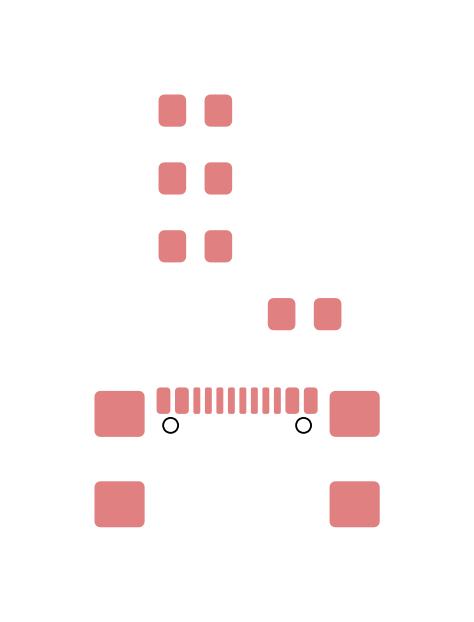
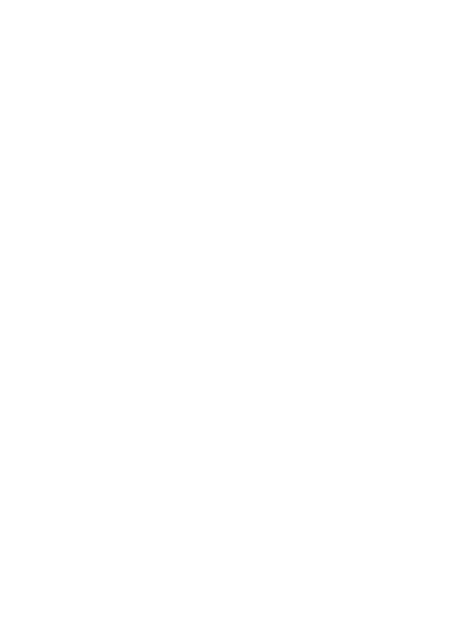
part: (195, 110) -> none
part: (195, 178) -> none
part: (195, 246) -> none
part: (304, 314) -> none
part: (237, 457) -> none

